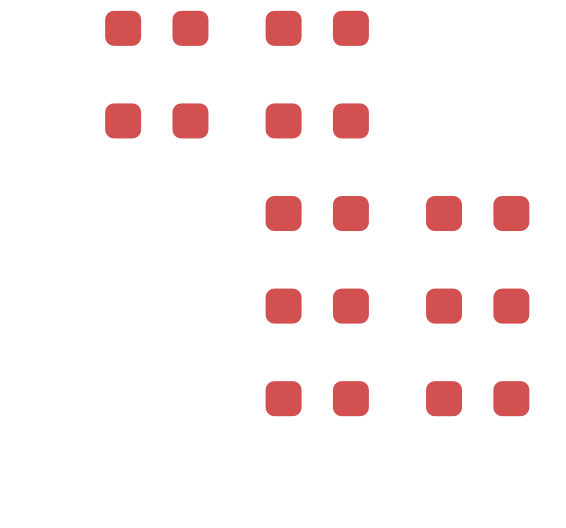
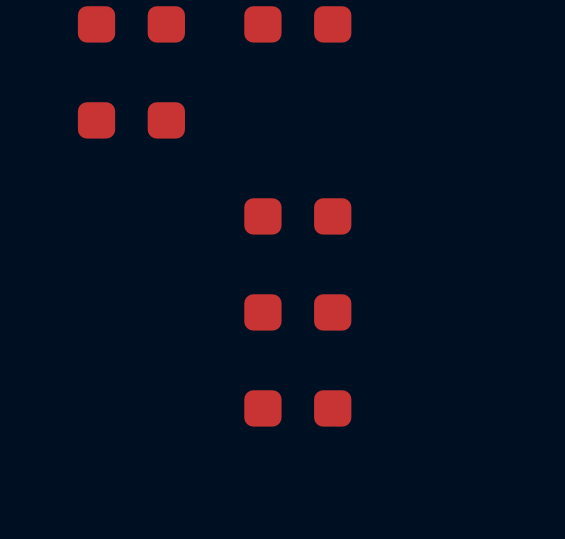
part: (317, 120) -> none
part: (477, 213) -> none
part: (477, 306) -> none
part: (477, 398) -> none

